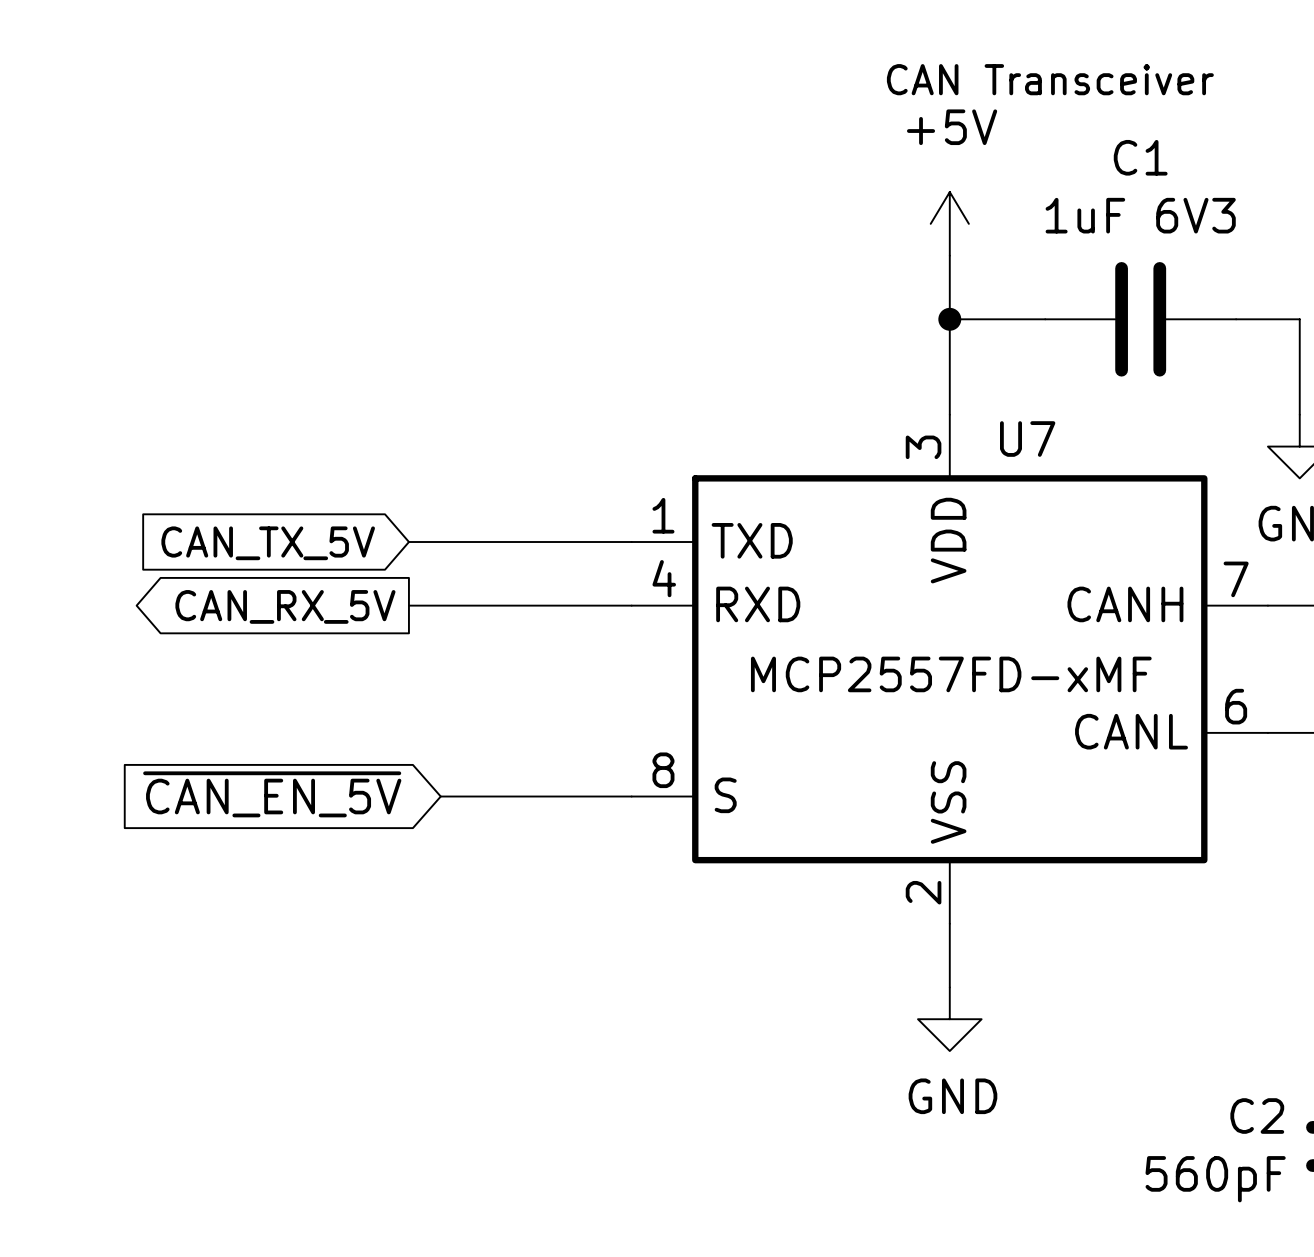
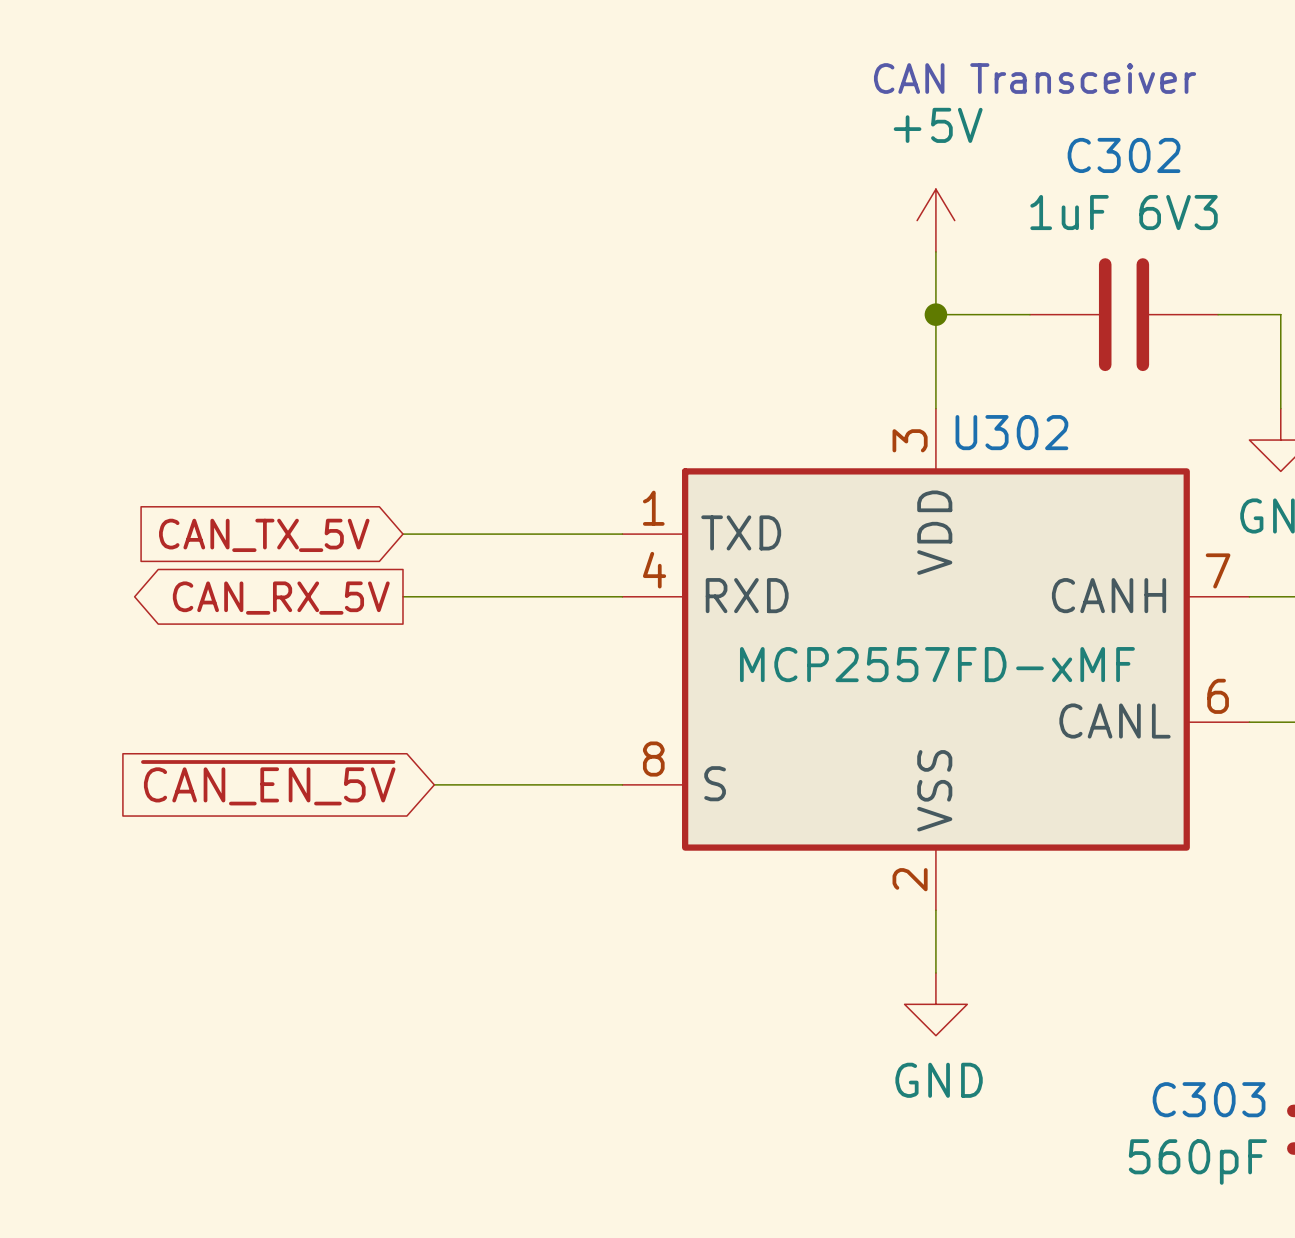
C1 name: C1 (1140, 157) -> C302 (1124, 155)
U7 name: U7 (1027, 439) -> U302 (1011, 432)
C2 name: C2 (1257, 1116) -> C303 (1209, 1099)

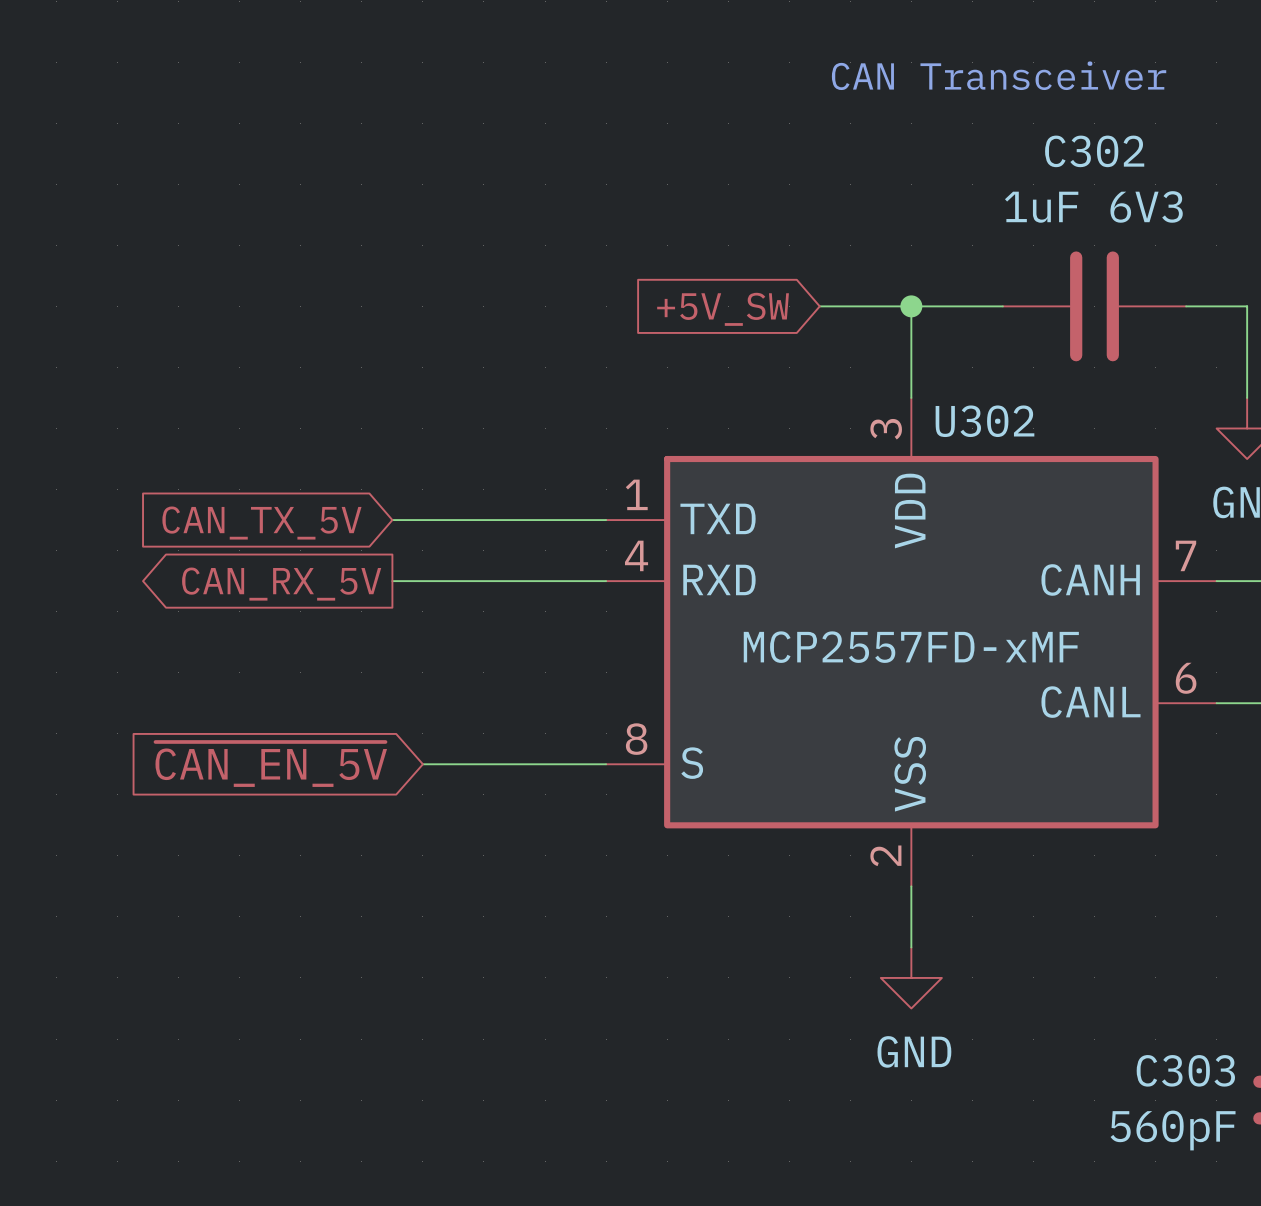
power symbol: +5V (935, 220) -> none
wire: (935, 251) (935, 314) -> (819, 306) (911, 306)
global label: none -> +5V_SW (723, 309)

